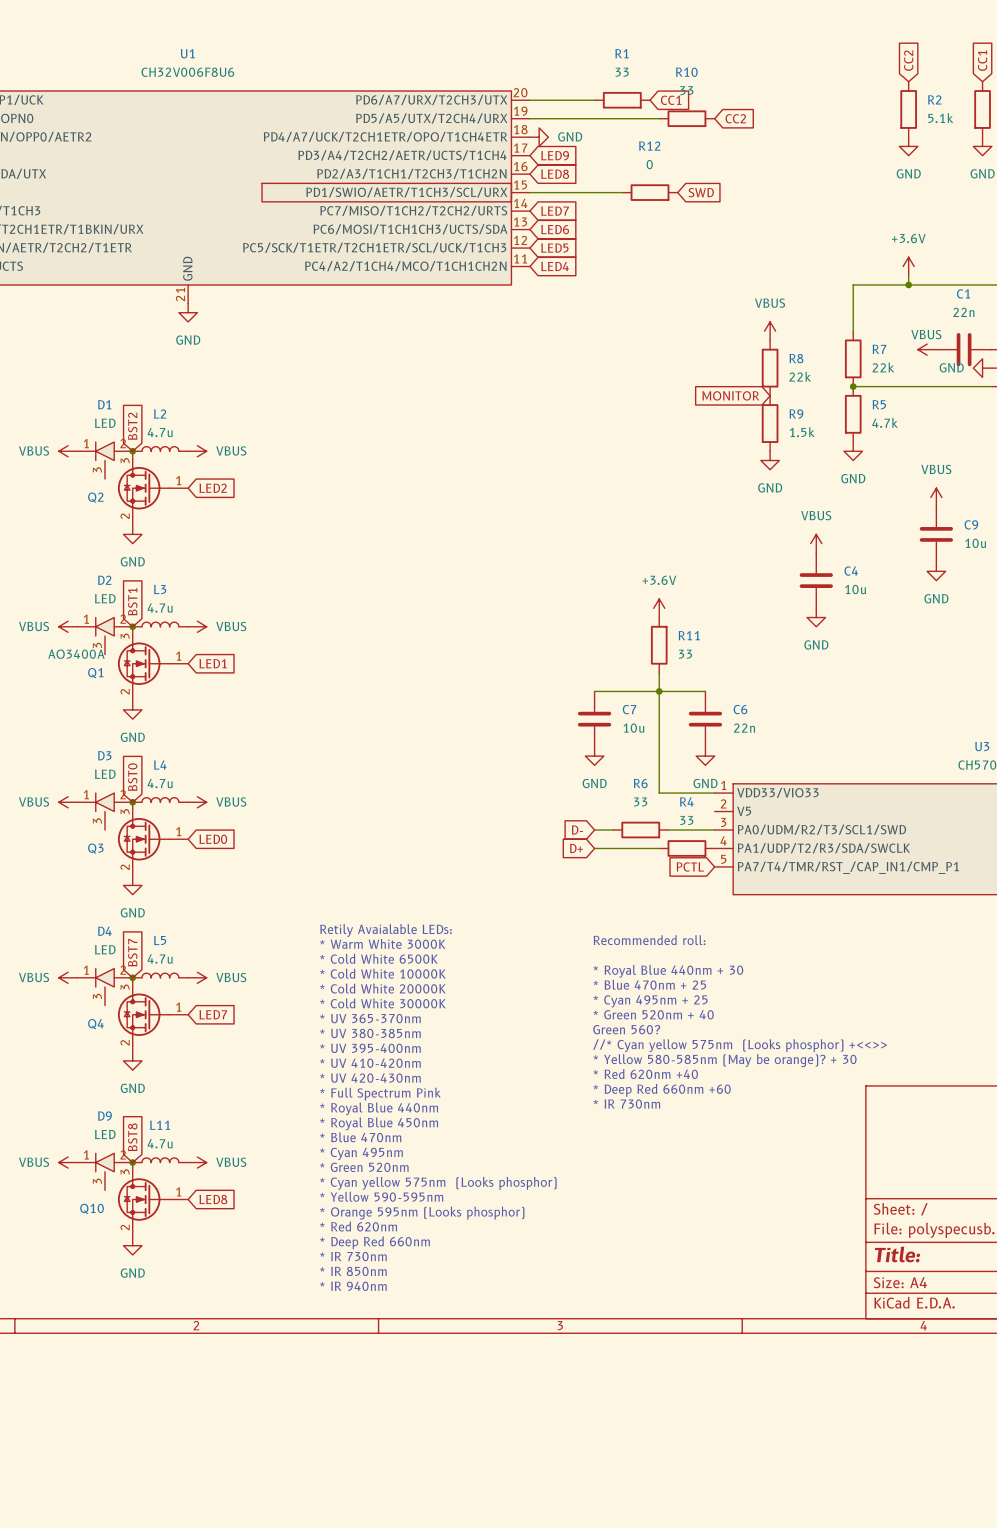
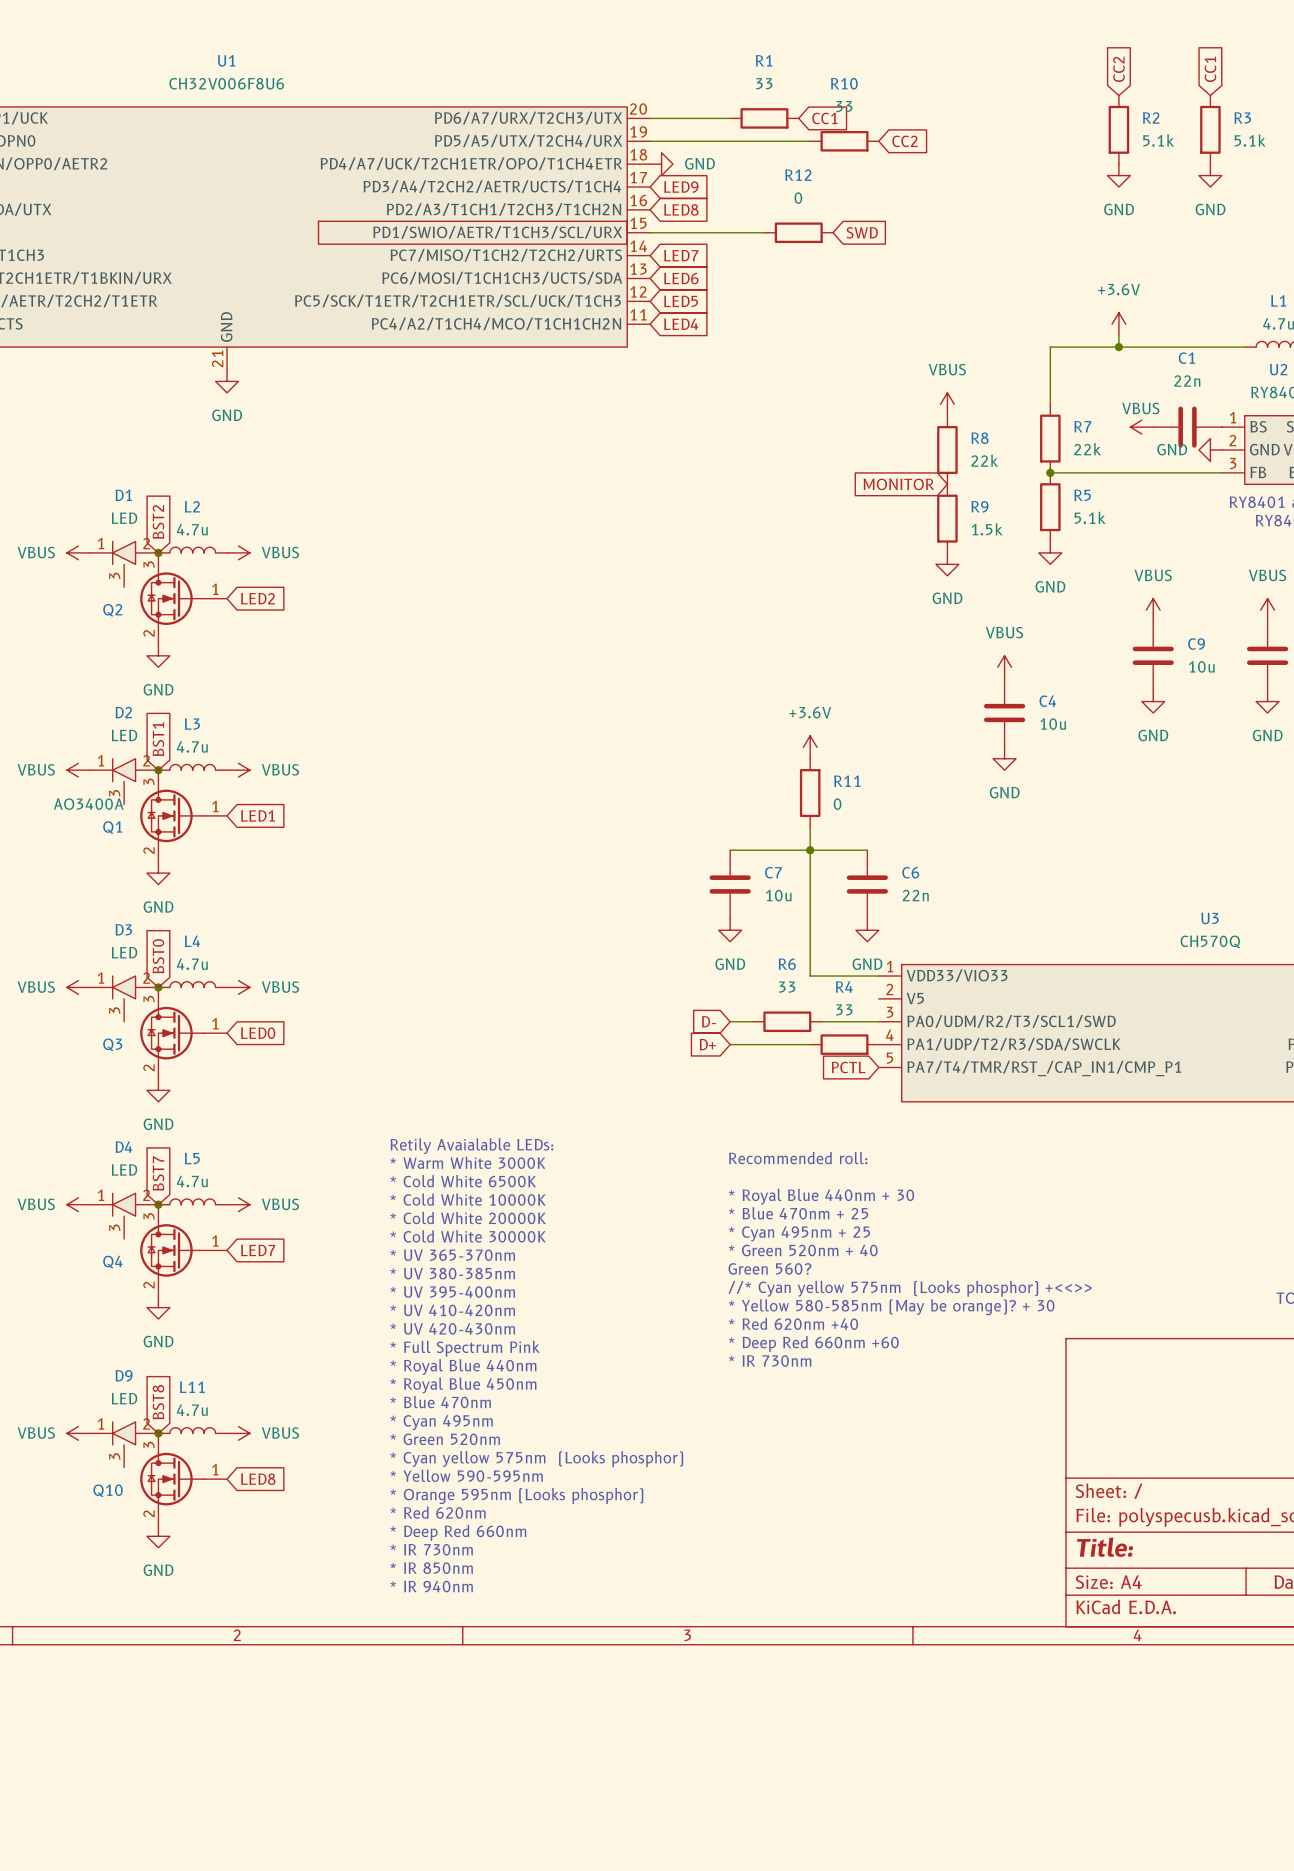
R5 value: 4.7k (885, 422) -> 5.1k (1090, 517)
R11 value: 33 (685, 654) -> 0 (837, 804)

